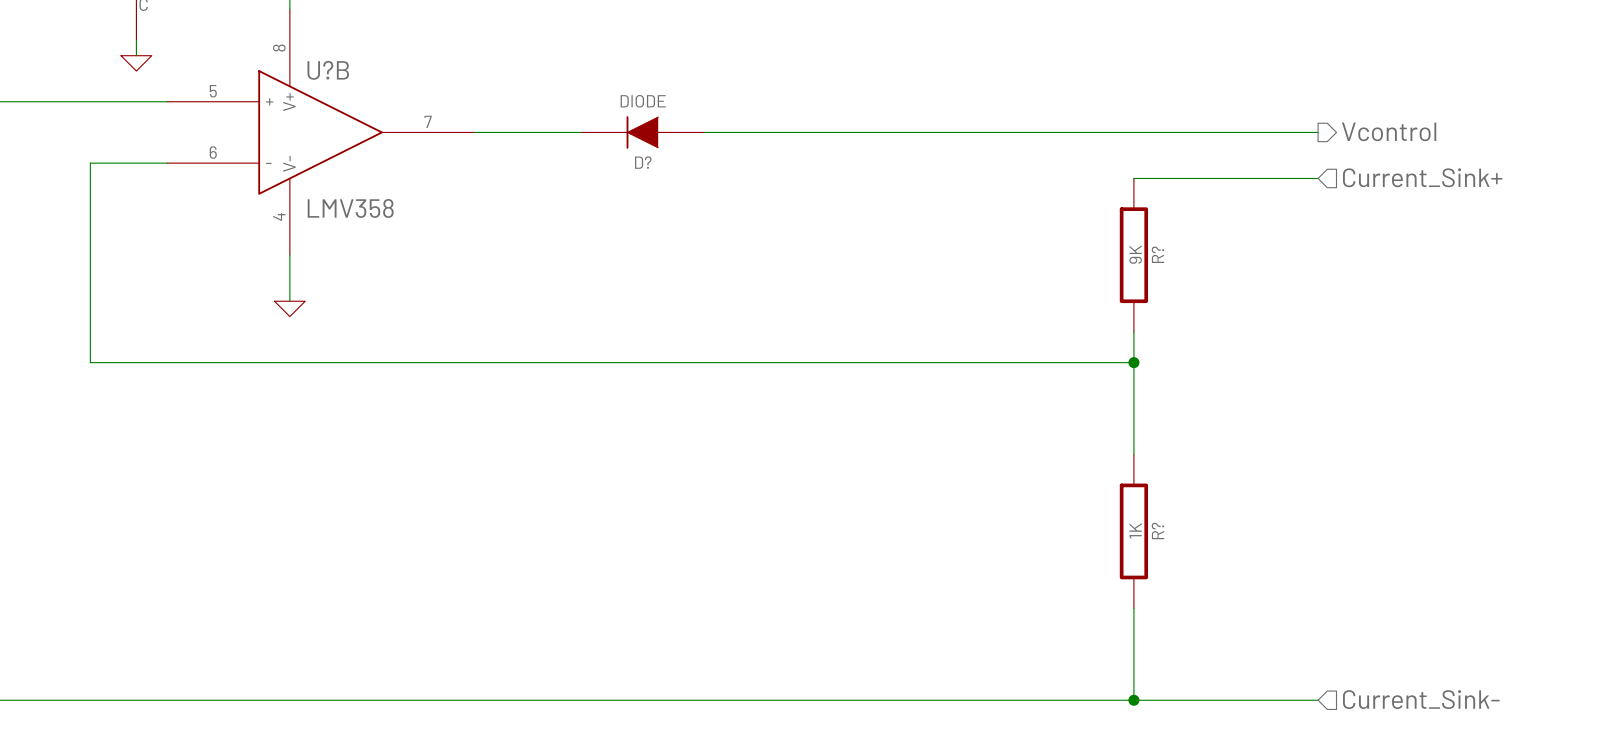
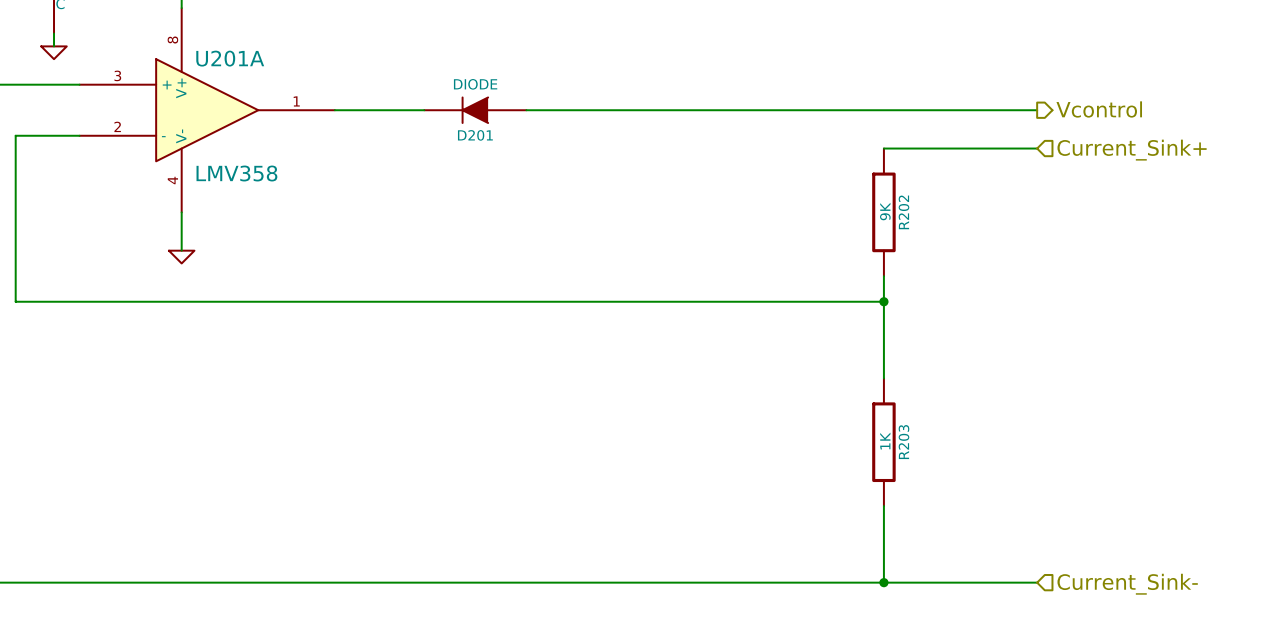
U?B name: U?B (328, 70) -> U201A (230, 58)
U?B pin number: 5 (213, 91) -> 3 (117, 75)
U?B pin number: 7 (428, 121) -> 1 (296, 101)
U?B pin number: 6 (213, 152) -> 2 (117, 126)
D? name: D? (643, 162) -> D201 (475, 135)
R? name: R? (1157, 254) -> R202 (903, 212)
R? name: R? (1157, 530) -> R203 (903, 442)

